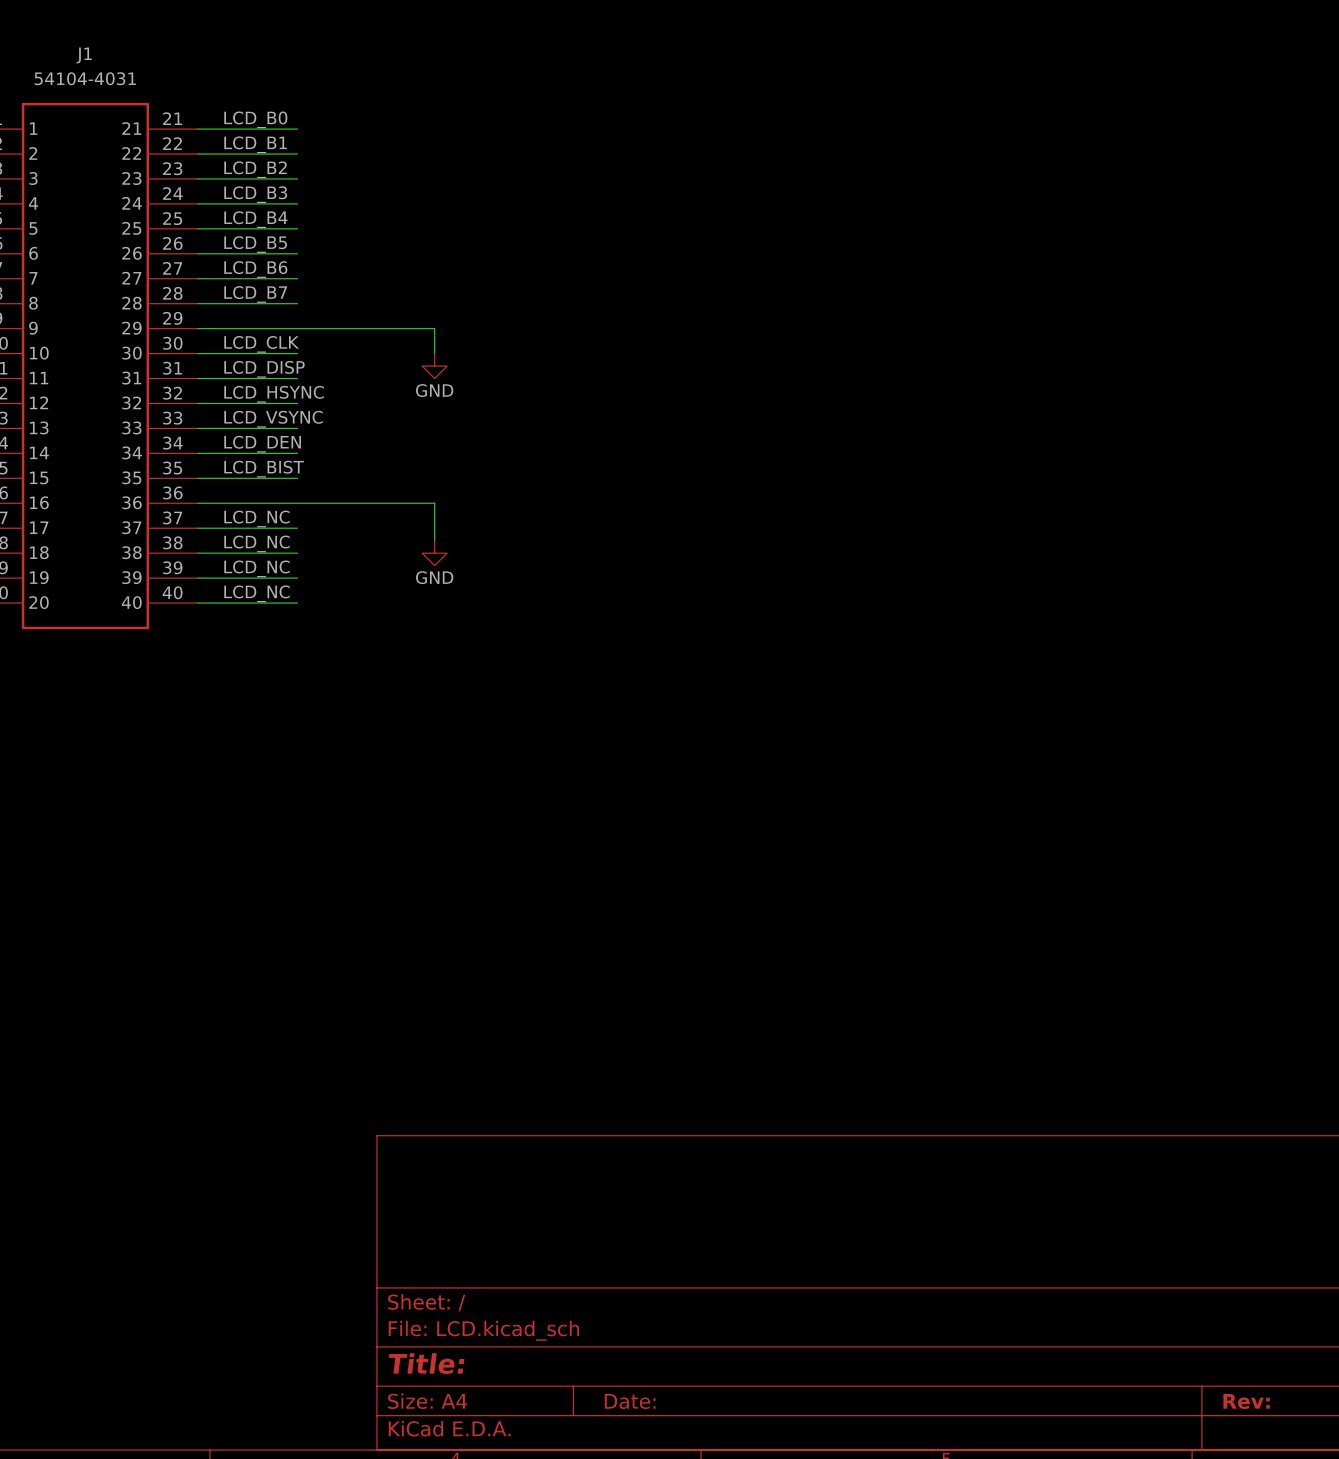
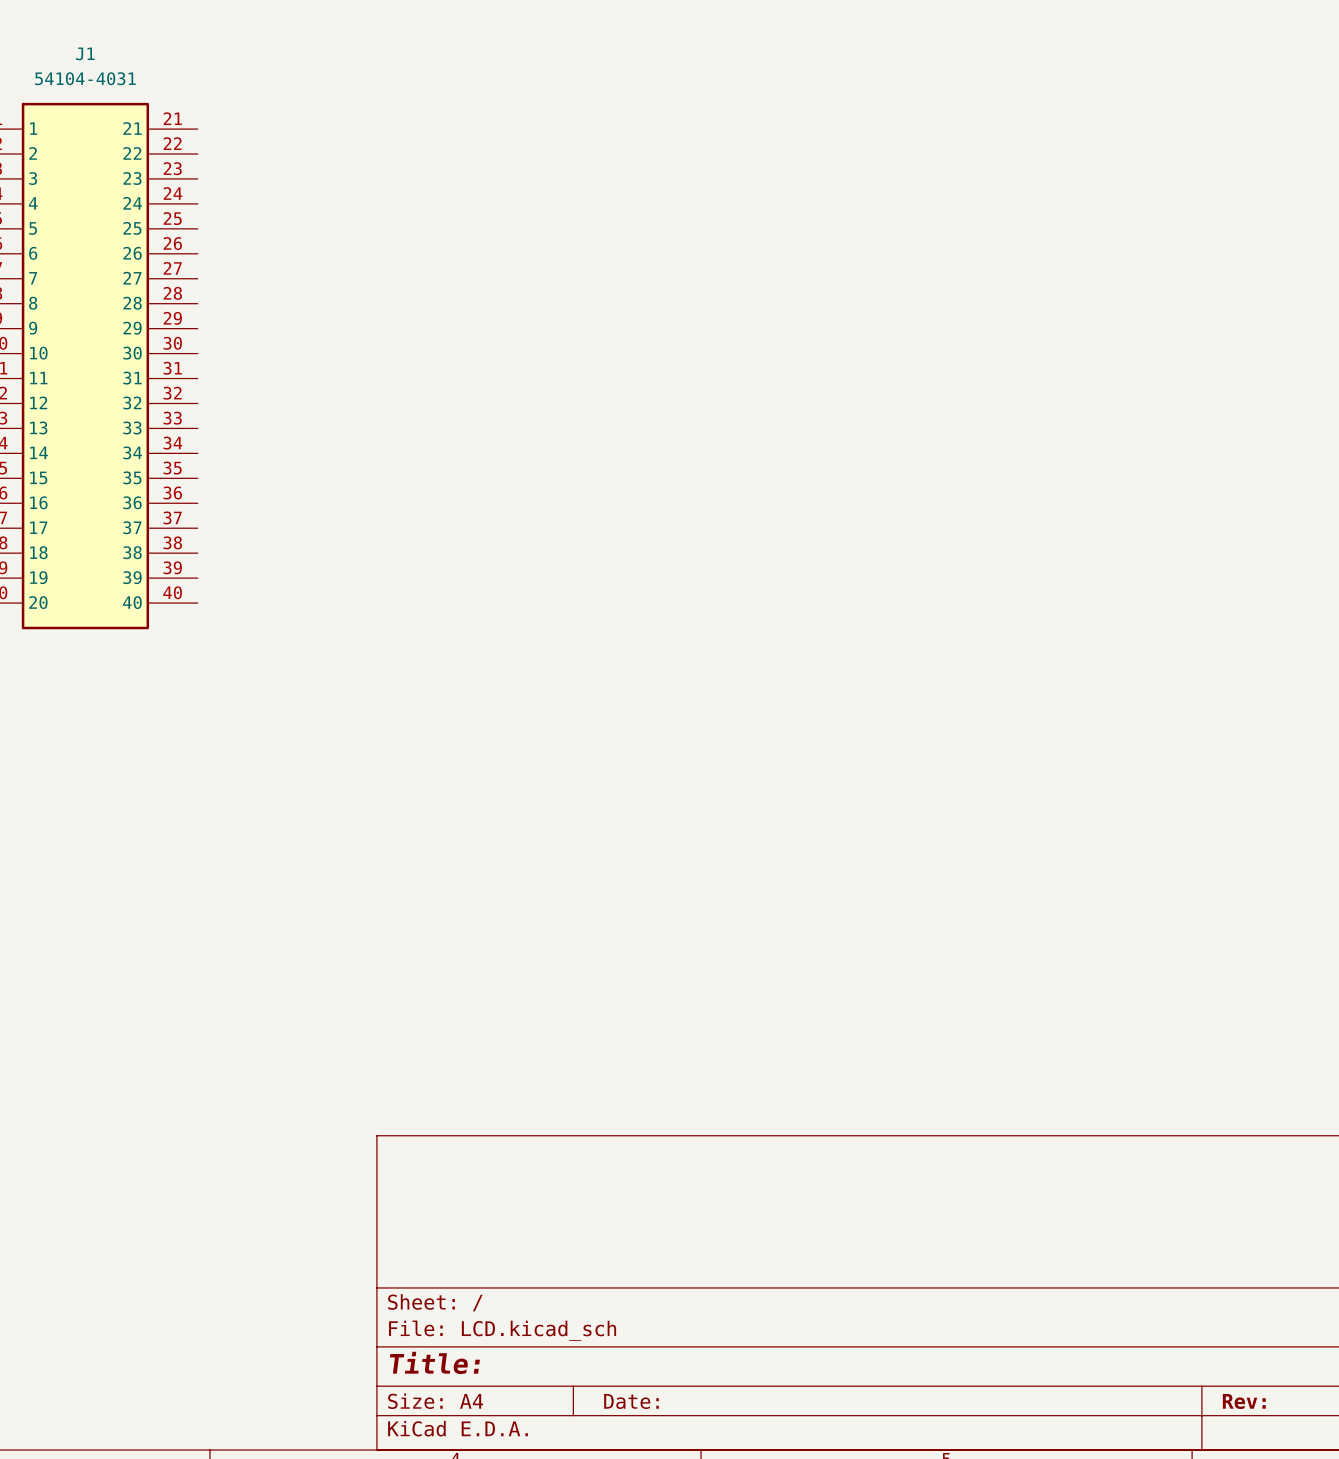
label: LCD_B0 (255, 119) -> none
wire: (197, 129) (297, 129) -> none
label: LCD_B1 (255, 144) -> none
wire: (197, 154) (297, 154) -> none
label: LCD_B2 (255, 169) -> none
wire: (197, 178) (297, 178) -> none
label: LCD_B3 (255, 194) -> none
wire: (197, 203) (297, 203) -> none
label: LCD_B4 (255, 219) -> none
wire: (197, 228) (297, 228) -> none
label: LCD_B5 (255, 244) -> none
wire: (197, 253) (297, 253) -> none
label: LCD_B6 (255, 269) -> none
wire: (197, 278) (297, 278) -> none
label: LCD_B7 (255, 294) -> none
wire: (197, 303) (297, 303) -> none
wire: (197, 328) (434, 328) (434, 353) -> none
label: LCD_CLK (261, 344) -> none
wire: (197, 353) (297, 353) -> none
power symbol: GND (434, 366) -> none
label: LCD_DISP (264, 369) -> none
wire: (197, 378) (297, 378) -> none
label: LCD_HSYNC (274, 394) -> none
wire: (197, 403) (297, 403) -> none
label: LCD_VSYNC (273, 419) -> none
wire: (197, 428) (297, 428) -> none
label: LCD_DEN (262, 444) -> none
wire: (197, 453) (297, 453) -> none
label: LCD_BIST (264, 469) -> none
wire: (197, 478) (297, 478) -> none
wire: (197, 503) (434, 503) (434, 540) -> none
label: LCD_NC (256, 518) -> none
wire: (197, 528) (297, 528) -> none
label: LCD_NC (256, 543) -> none
wire: (197, 553) (297, 553) -> none
power symbol: GND (434, 553) -> none
label: LCD_NC (256, 568) -> none
wire: (197, 578) (297, 578) -> none
label: LCD_NC (256, 593) -> none
wire: (197, 603) (297, 603) -> none

